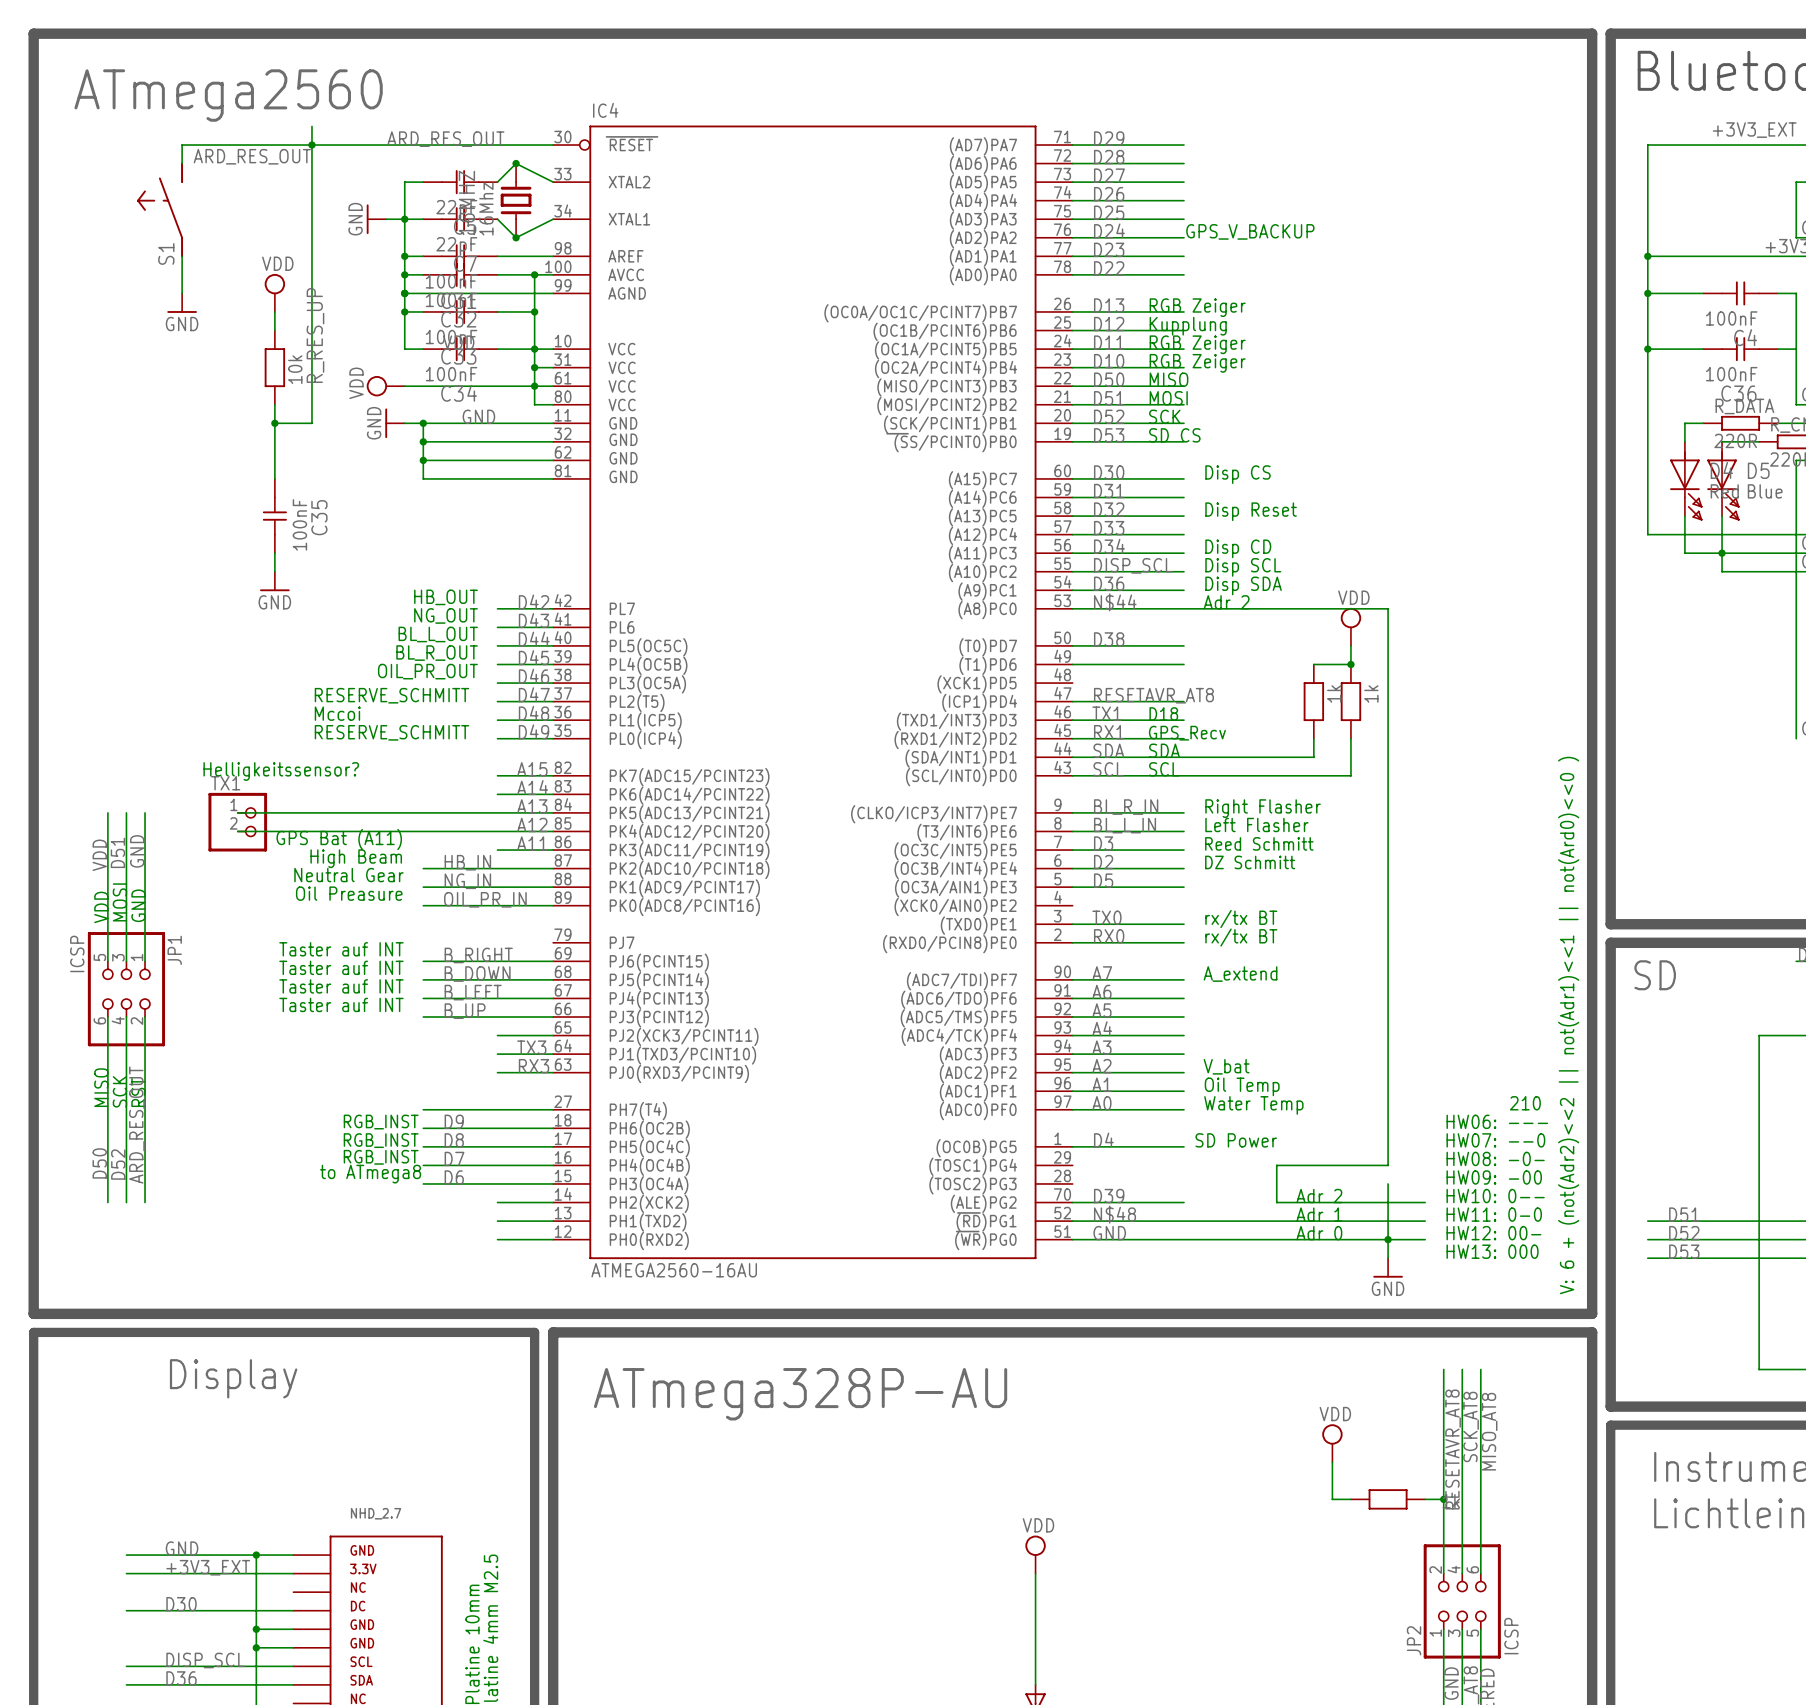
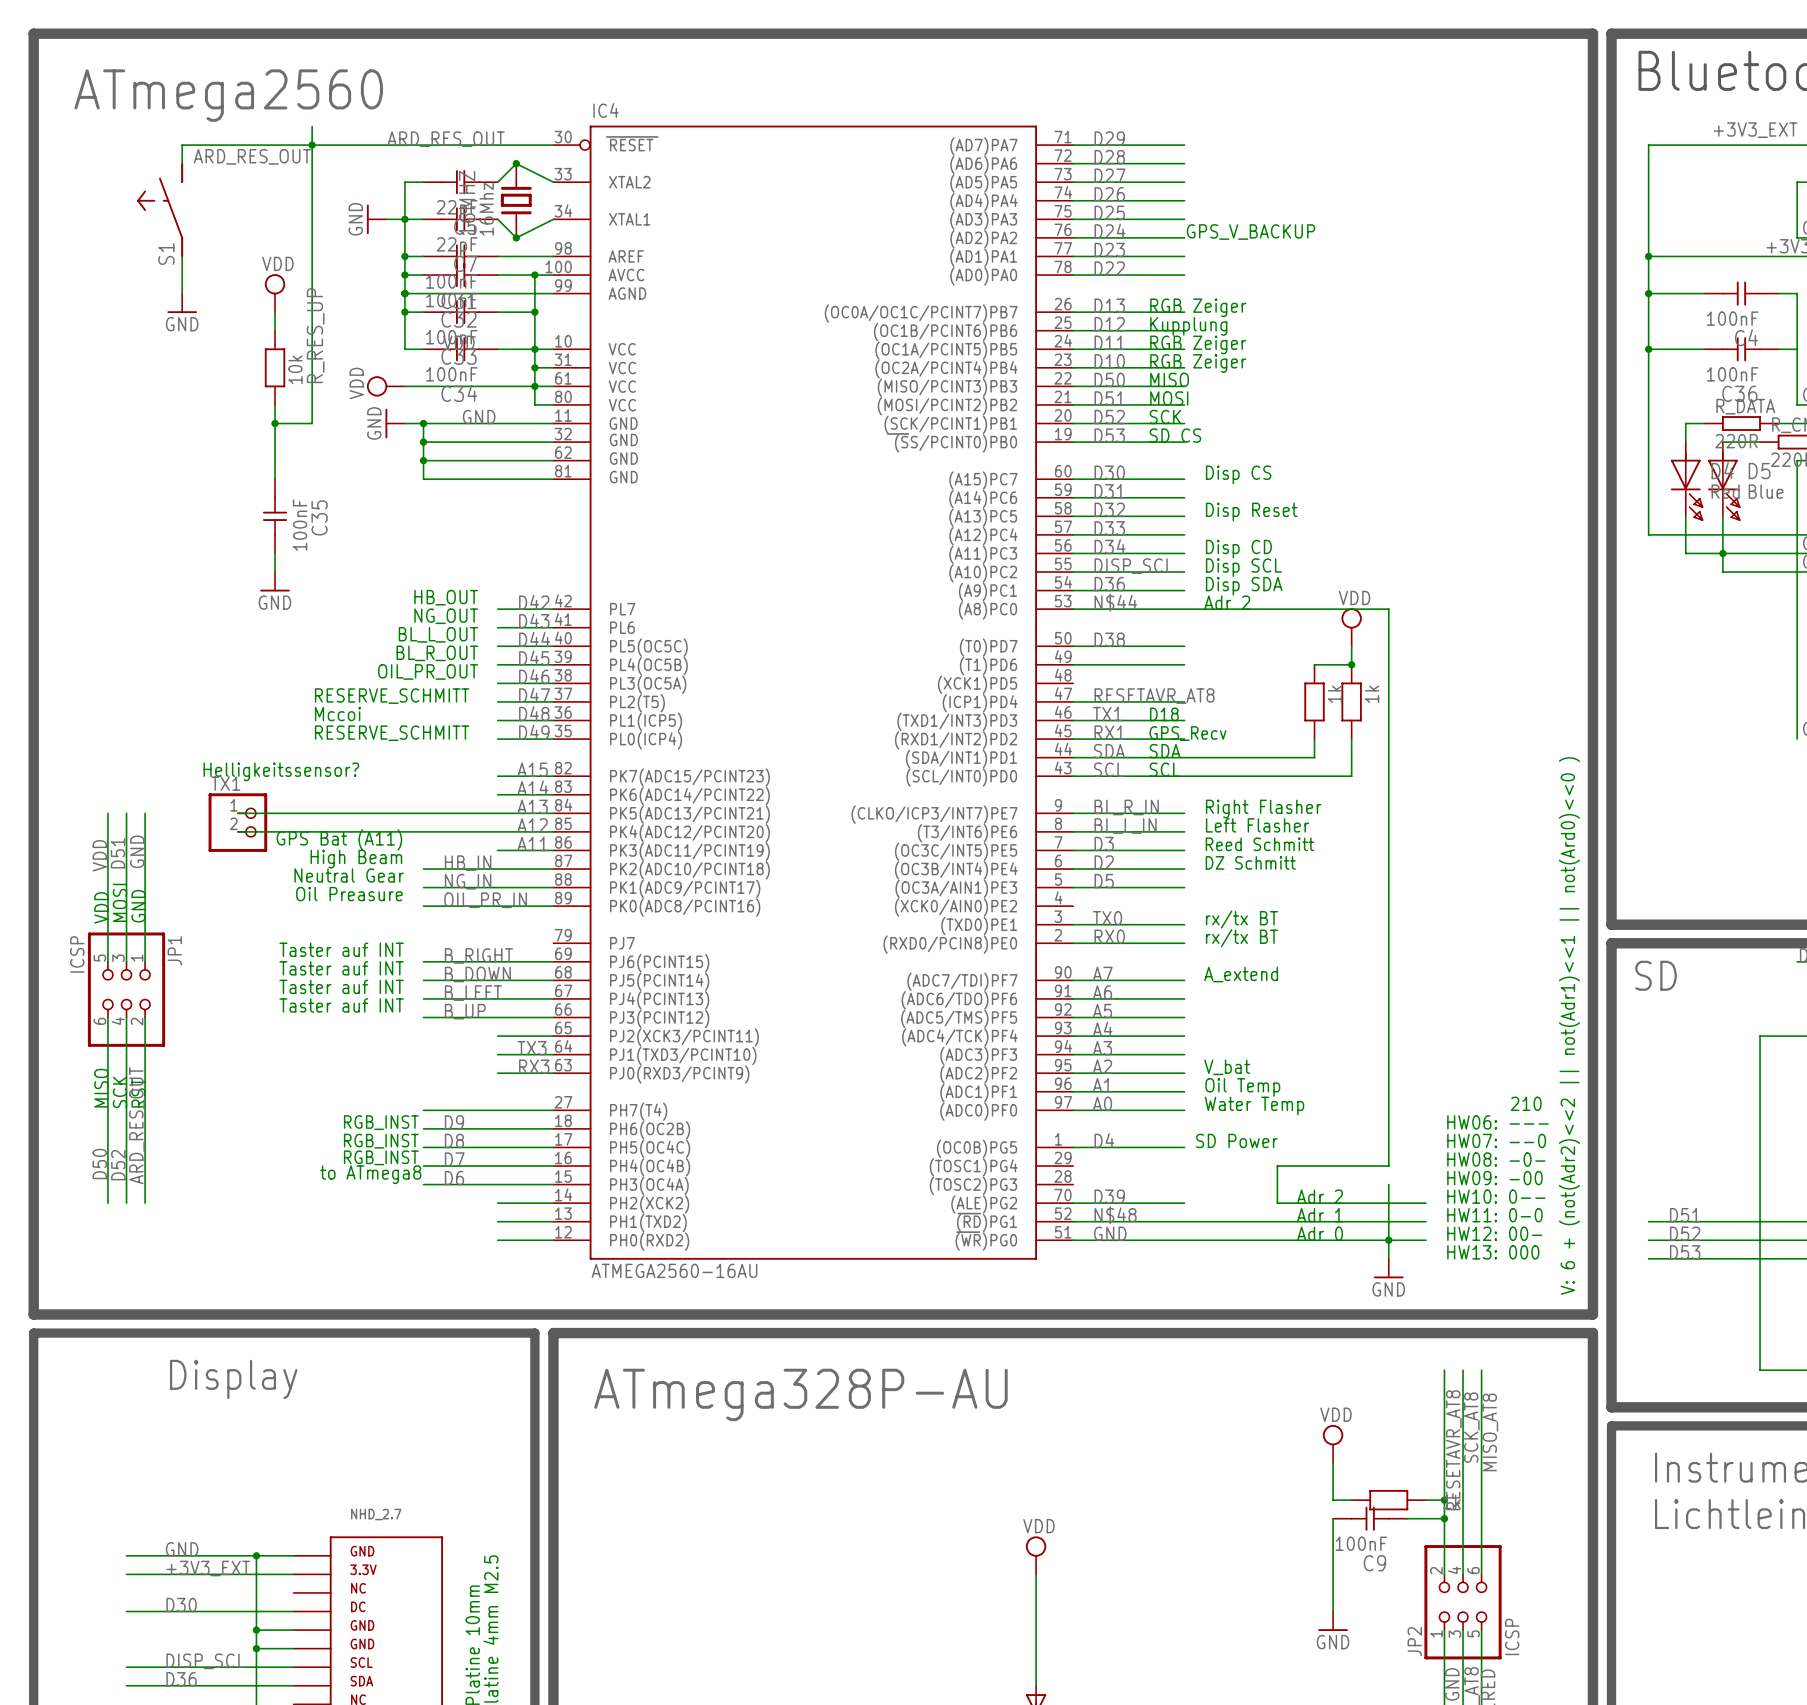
wire: none -> (1333, 1518) (1333, 1611)
C9: none -> 100nF (1370, 1518)
wire: none -> (1407, 1518) (1444, 1518)
junction: none -> (1444, 1518)
power symbol: none -> GND (1333, 1621)

